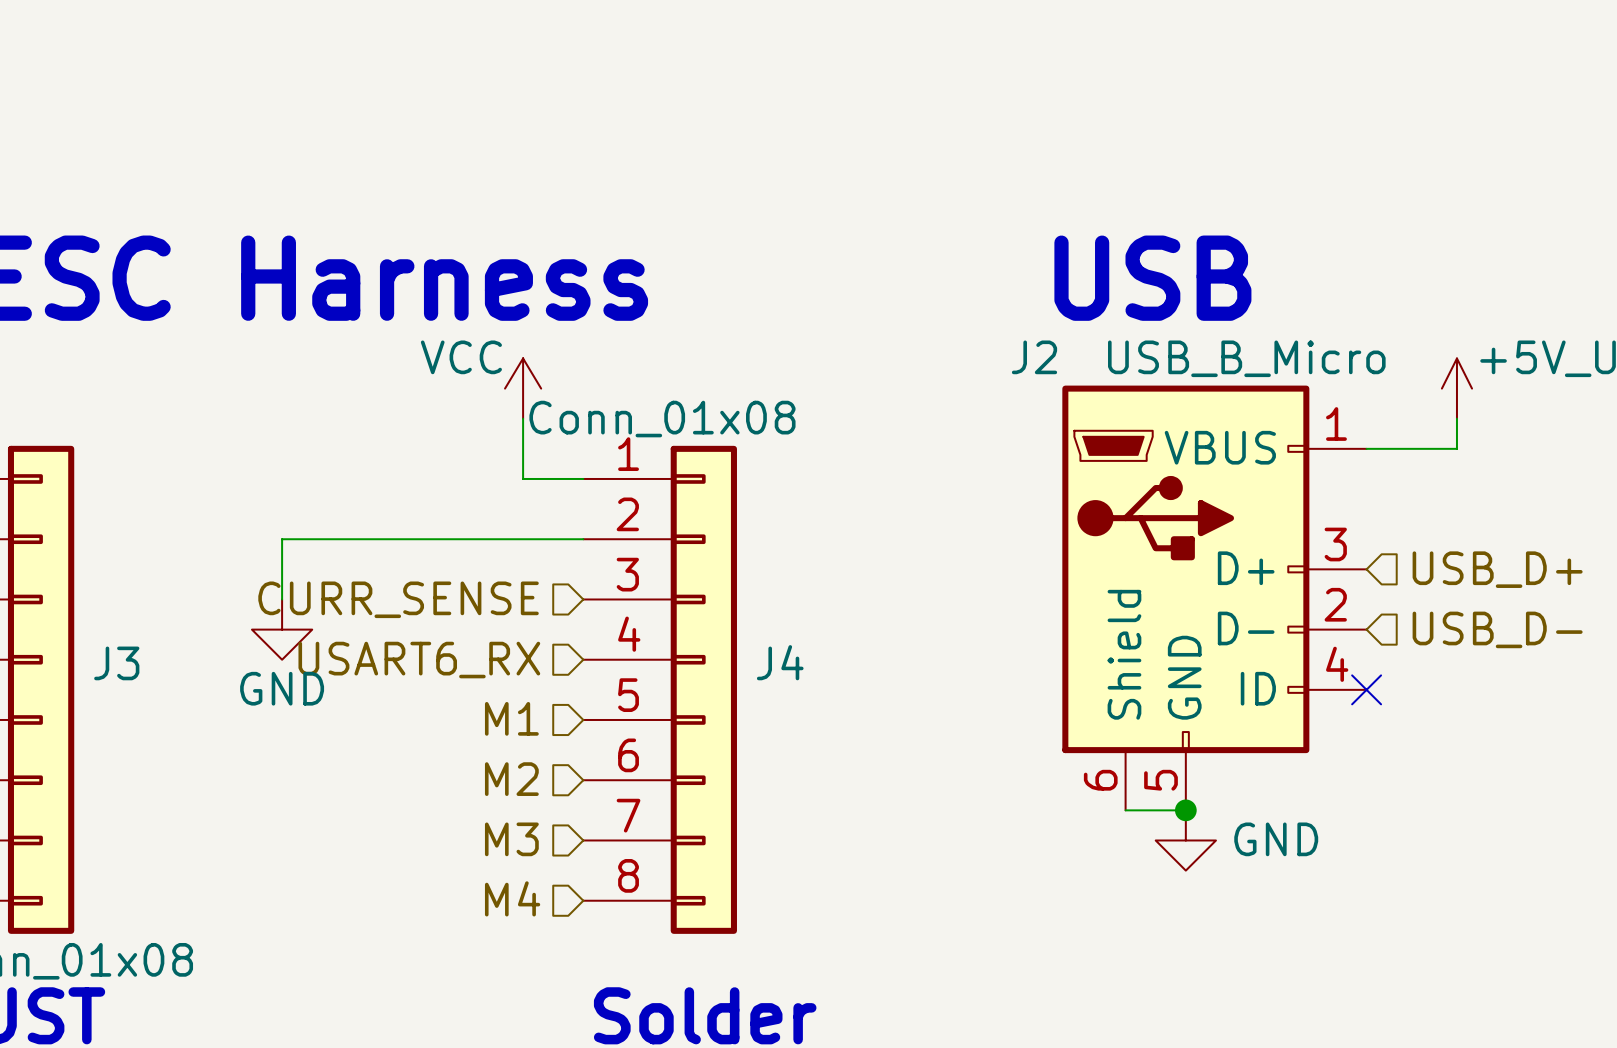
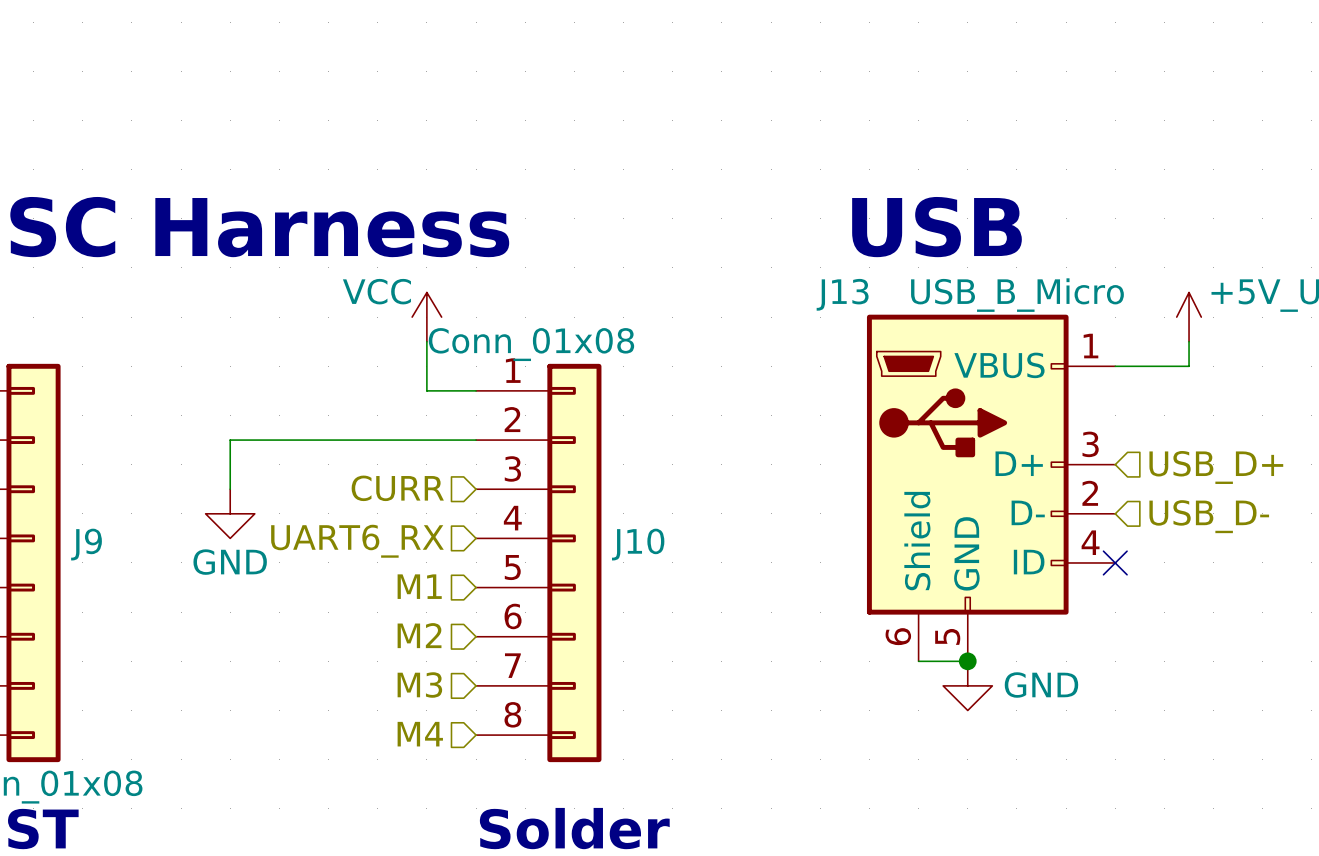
J2 name: J2 (1034, 357) -> J13 (842, 294)
hierarchical label: CURR_SENSE (398, 599) -> CURR (397, 488)
hierarchical label: USART6_RX (419, 660) -> UART6_RX (357, 541)
J4 name: J4 (780, 662) -> J10 (638, 544)
J3 name: J3 (116, 663) -> J9 (86, 544)

